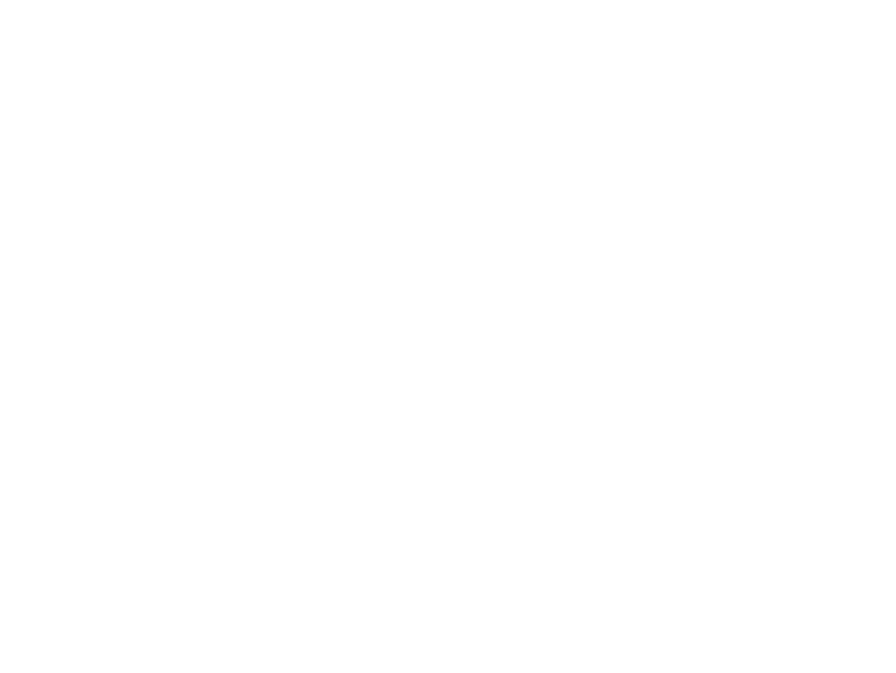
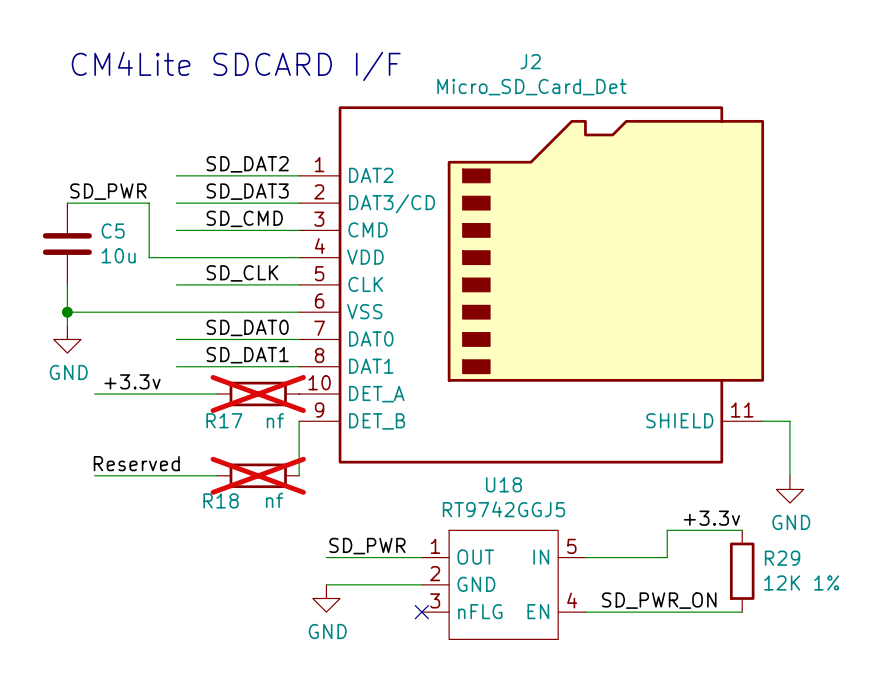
text: none -> CM4Lite SDCARD I/F (236, 66)
label: none -> SD_DAT2 (247, 164)
wire: none -> (176, 175) (299, 175)
label: none -> SD_PWR (108, 191)
label: none -> SD_DAT3 (247, 191)
wire: none -> (67, 203) (149, 203) (149, 257) (299, 257)
wire: none -> (176, 203) (299, 203)
label: none -> SD_CMD (244, 218)
wire: none -> (176, 230) (299, 230)
C5: none -> 10u (67, 244)
label: none -> SD_CLK (242, 273)
wire: none -> (67, 284) (67, 325)
wire: none -> (176, 284) (299, 284)
J2: none -> Micro_SD_Card_Det (531, 284)
wire: none -> (67, 312) (299, 312)
junction: none -> (67, 312)
label: none -> SD_DAT0 (247, 327)
power symbol: none -> GND (67, 339)
wire: none -> (176, 339) (299, 339)
label: none -> SD_DAT1 (247, 355)
wire: none -> (176, 366) (299, 366)
label: none -> +3.3v (132, 381)
wire: none -> (94, 393) (217, 393)
R17: none -> nf (258, 393)
wire: none -> (299, 421) (299, 475)
wire: none -> (762, 421) (789, 421) (789, 475)
label: none -> Reserved (136, 463)
wire: none -> (94, 475) (217, 475)
R18: none -> nf (258, 475)
power symbol: none -> GND (789, 489)
label: none -> +3.3v (711, 518)
wire: none -> (742, 530) (667, 530) (667, 557) (585, 557)
label: none -> SD_PWR (367, 546)
wire: none -> (326, 557) (421, 557)
R29: none -> 12K 1% (742, 571)
wire: none -> (326, 584) (421, 584)
U18: none -> RT9742GGJ5 (503, 584)
power symbol: none -> GND (326, 598)
label: none -> SD_PWR_ON (659, 600)
no-connect mark: none -> (421, 612)
wire: none -> (585, 612) (742, 612)

